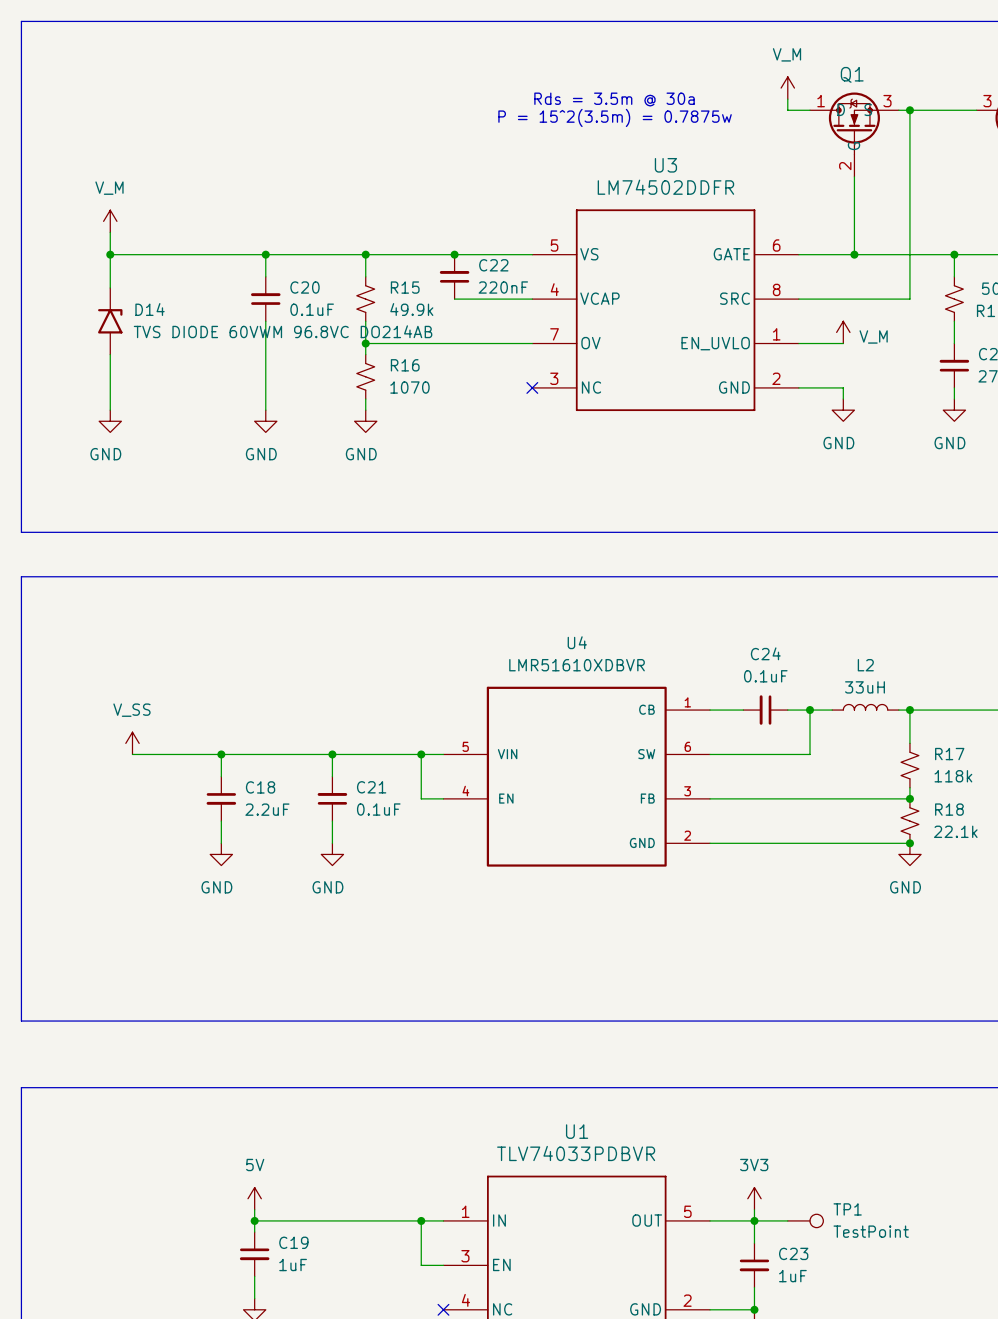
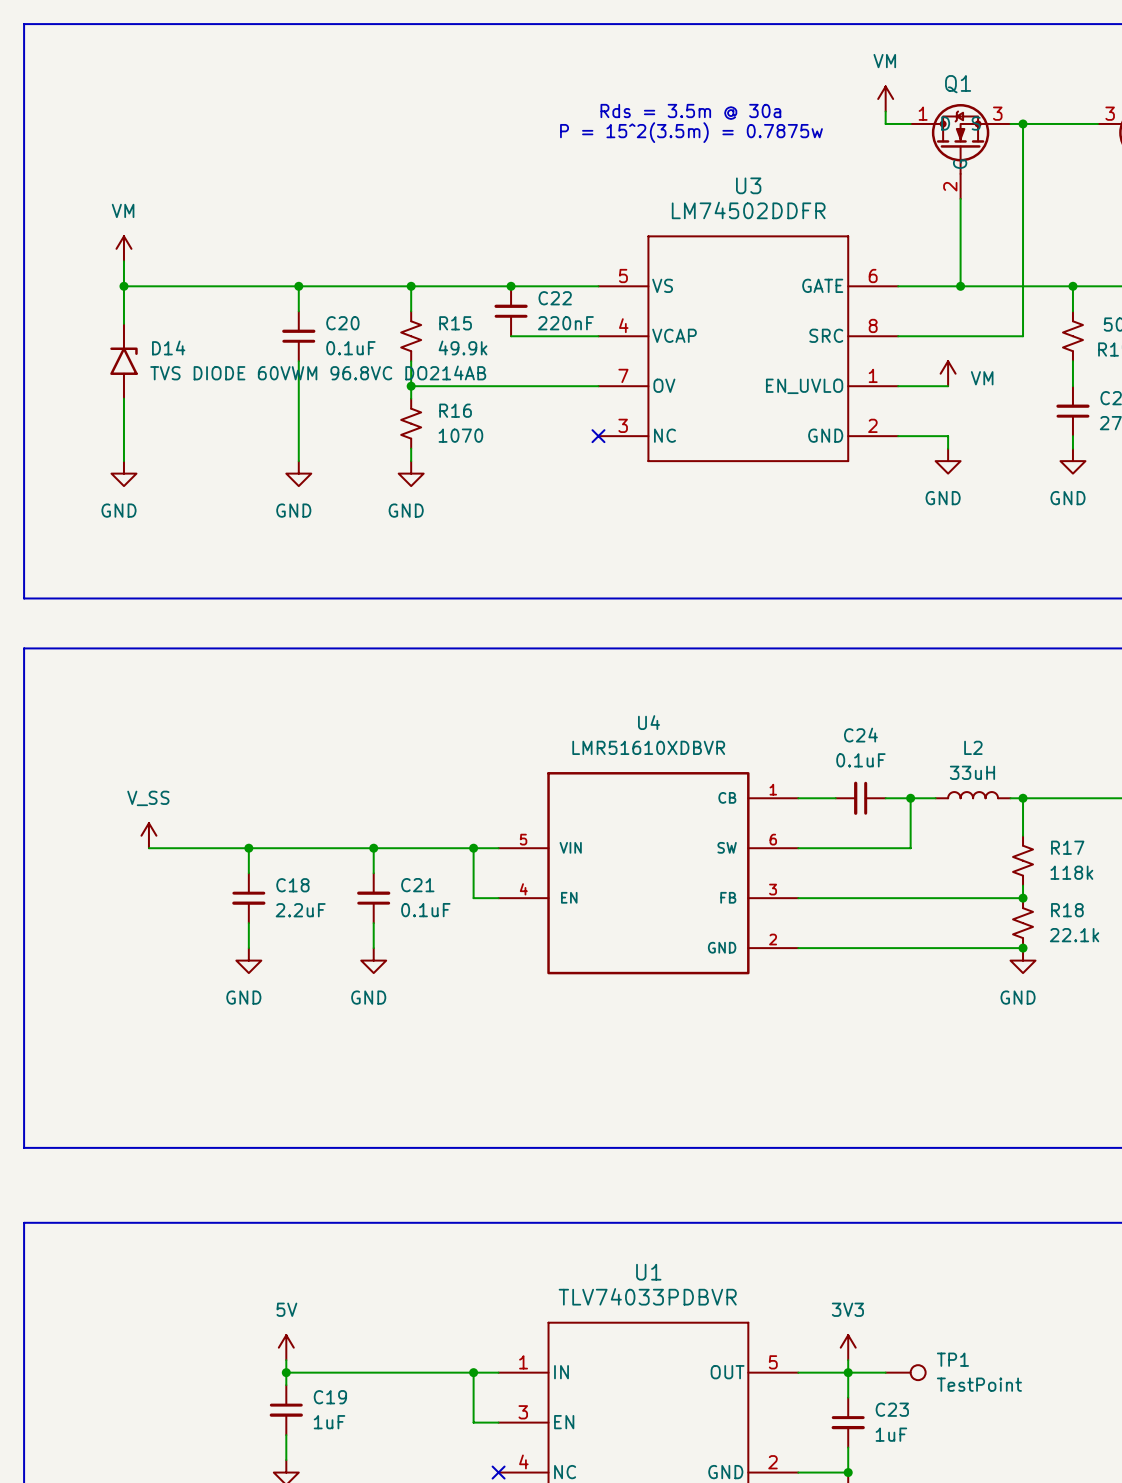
power symbol: V_M (787, 88) -> VM (885, 99)
power symbol: V_M (110, 221) -> VM (123, 248)
power symbol: V_M (843, 332) -> VM (948, 373)

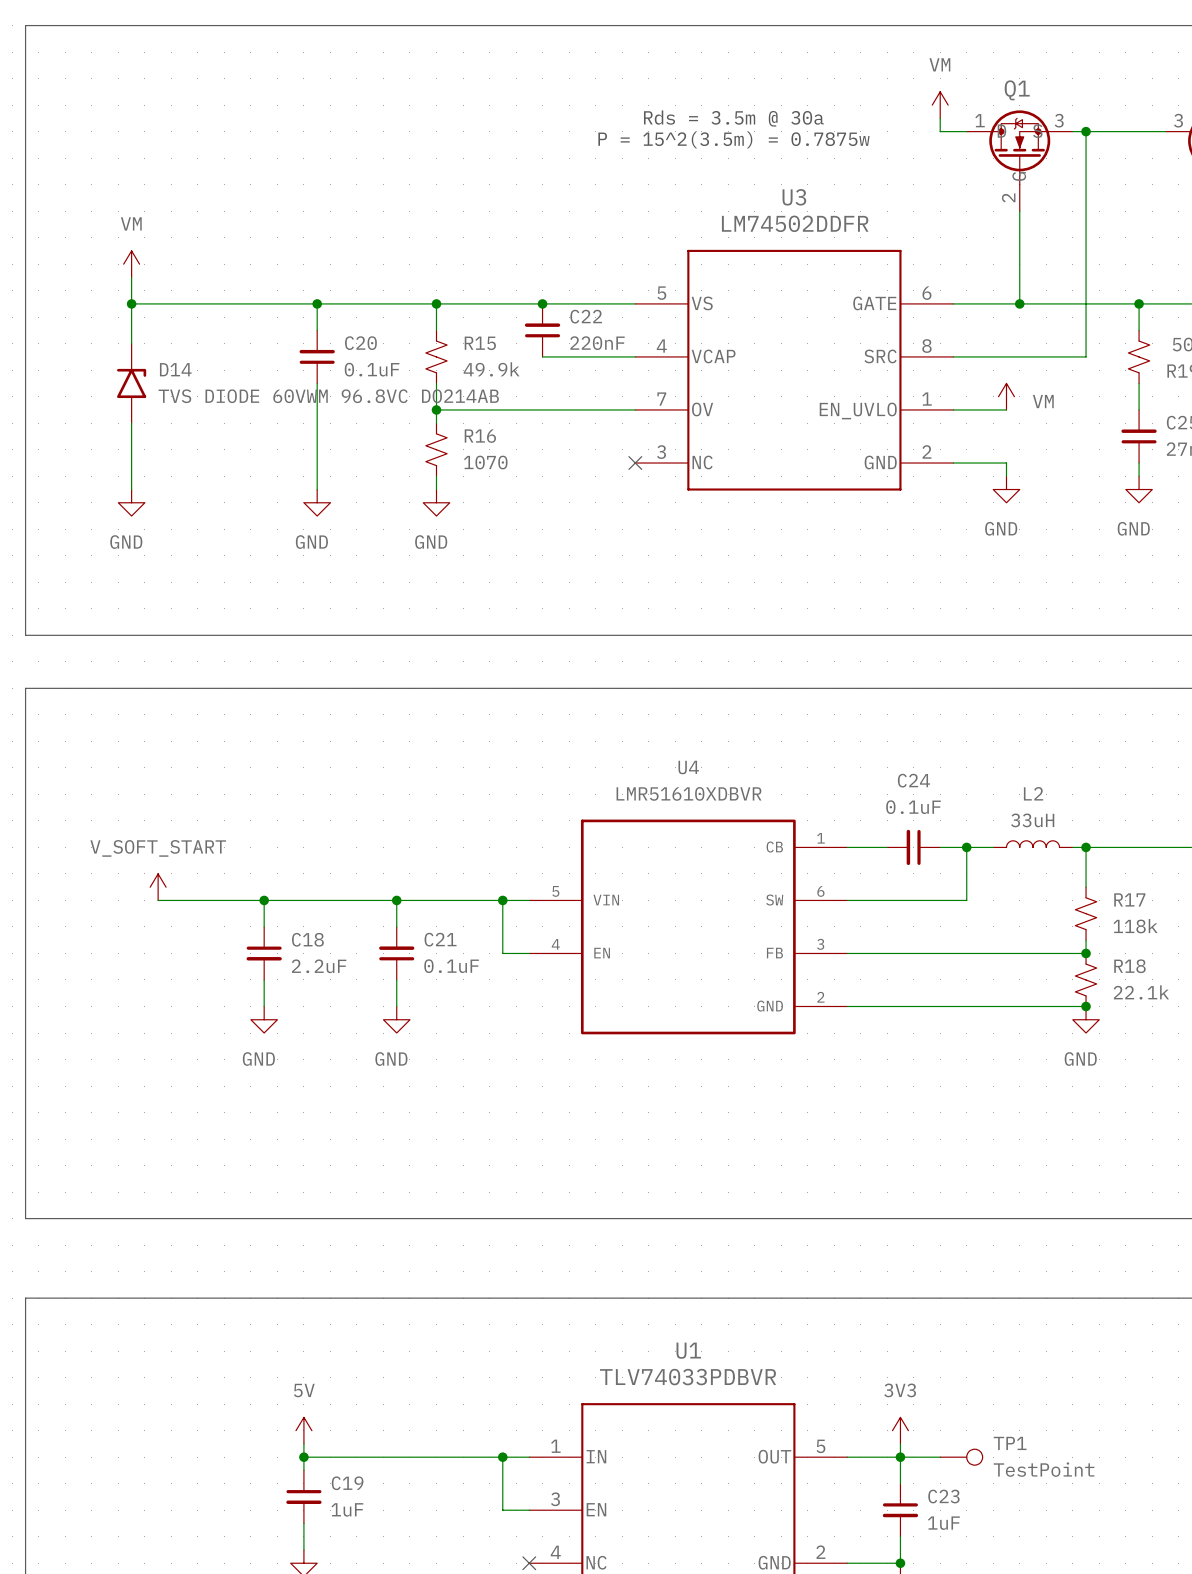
power symbol: V_SS (148, 835) -> V_SOFT_START (158, 887)

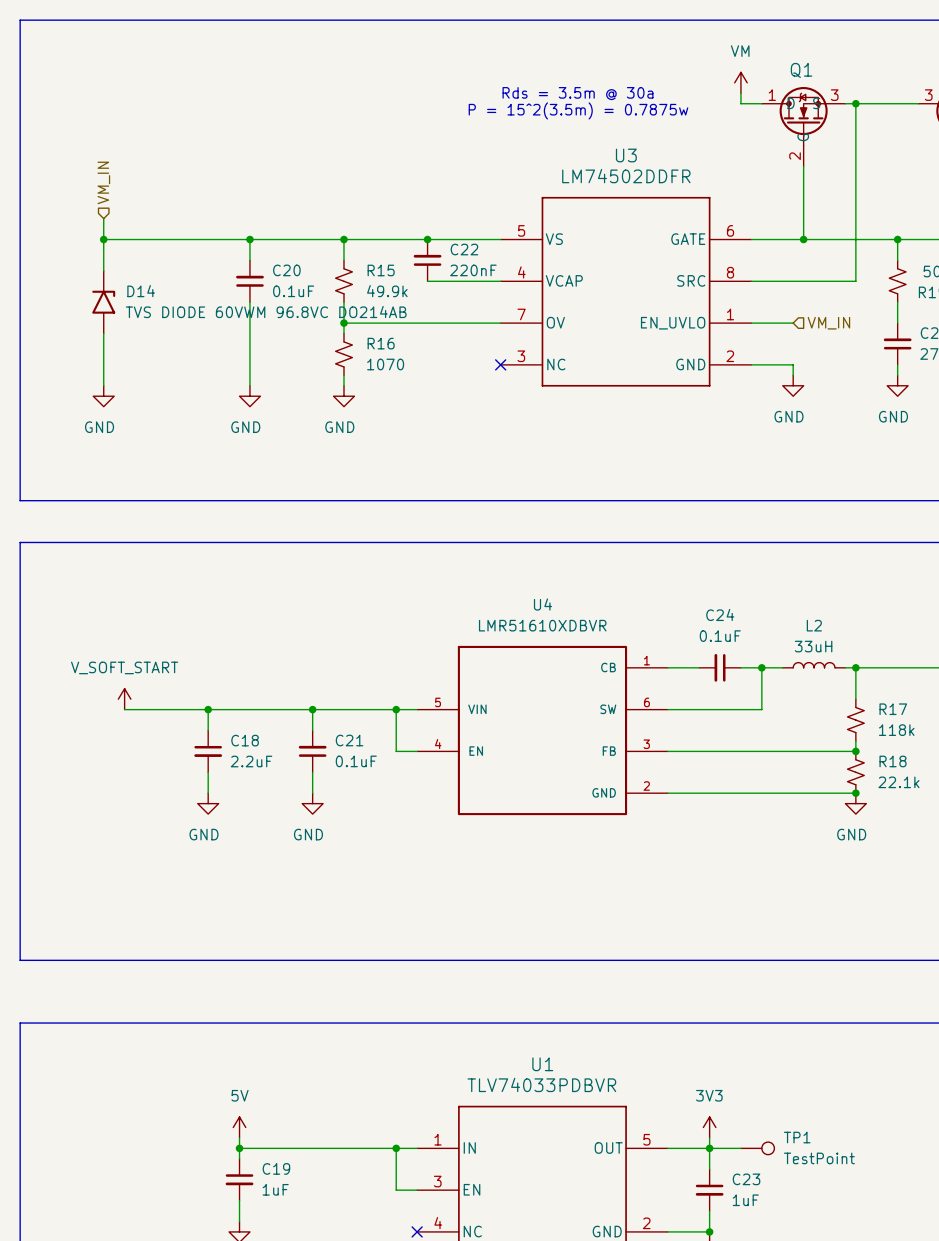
hierarchical label: none -> VM_IN (103, 182)
power symbol: VM (131, 264) -> none
power symbol: VM (1006, 396) -> none
hierarchical label: none -> VM_IN (828, 323)

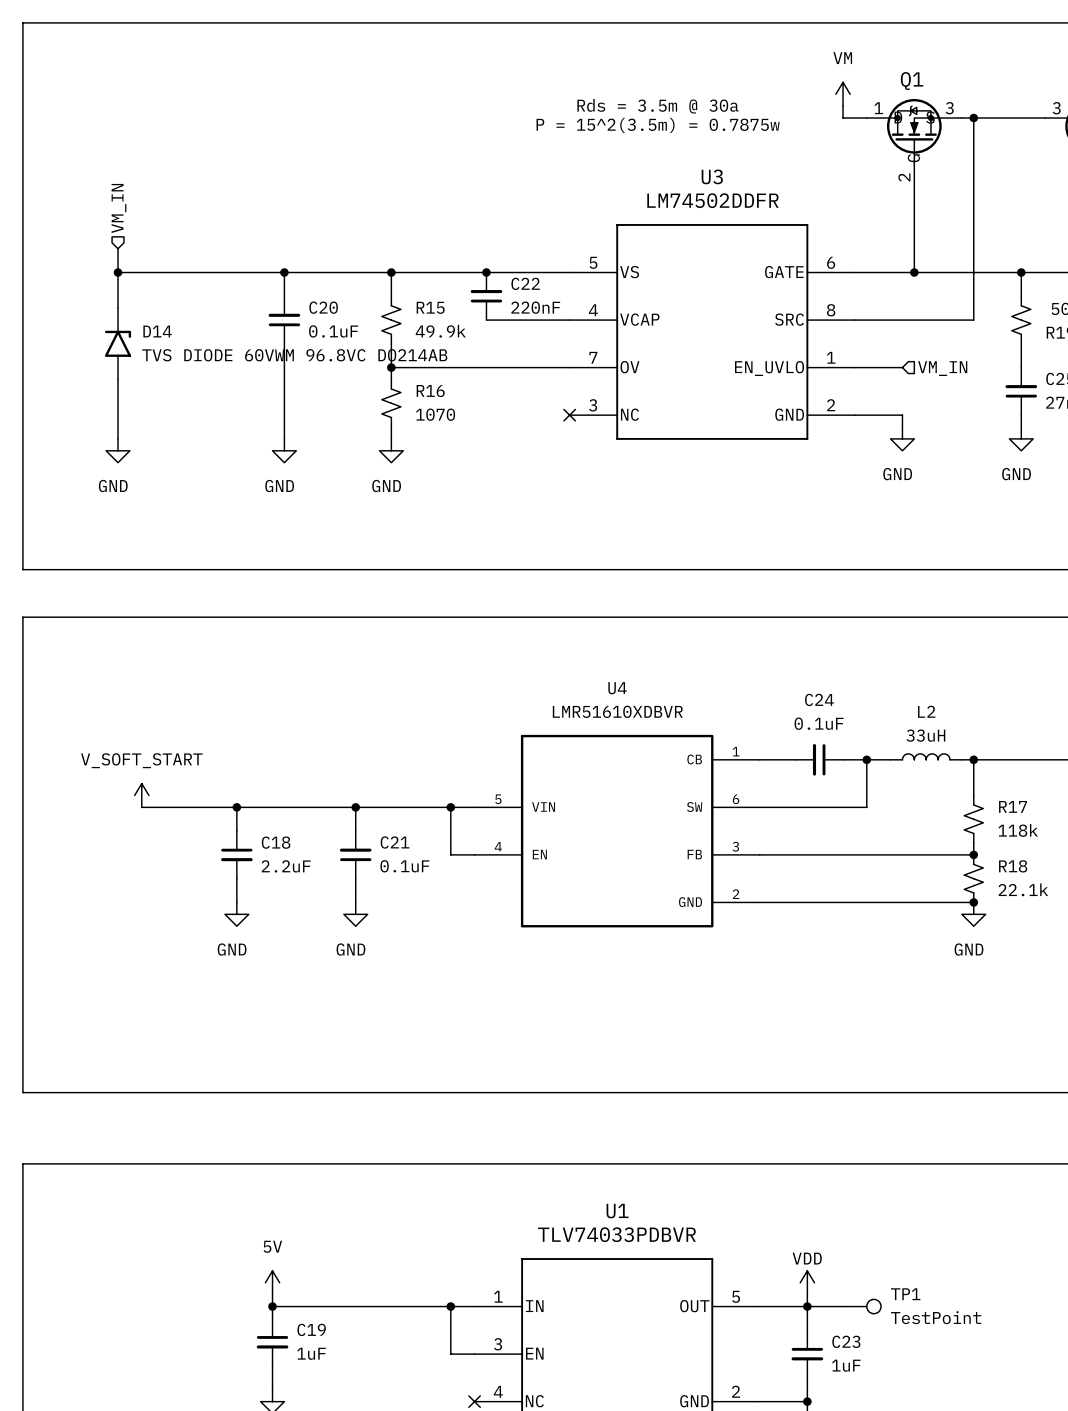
power symbol: 3V3 (709, 1127) -> VDD (807, 1282)

